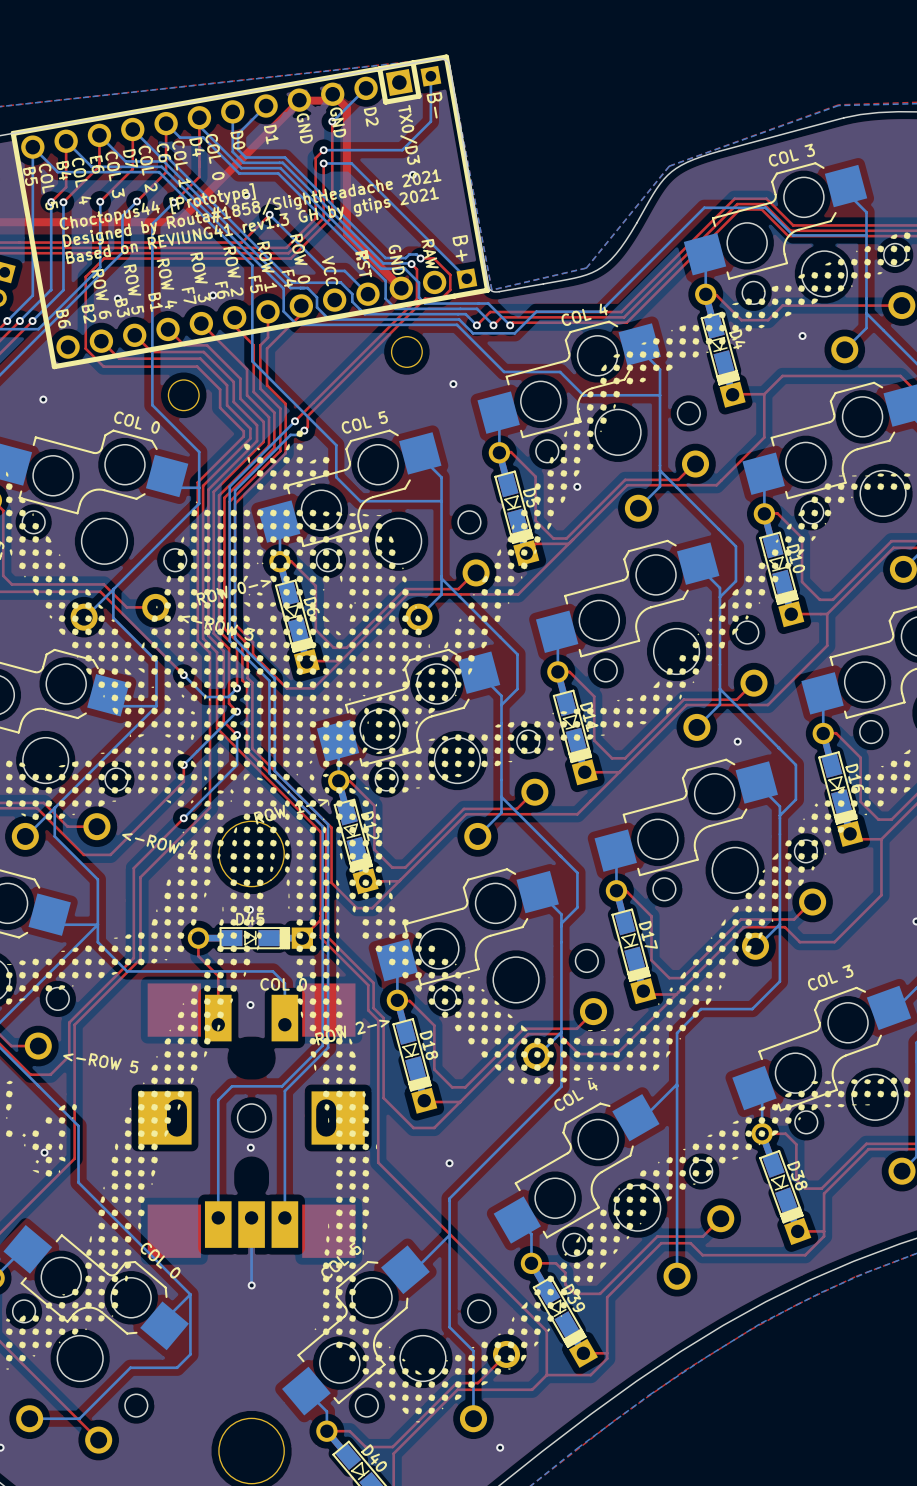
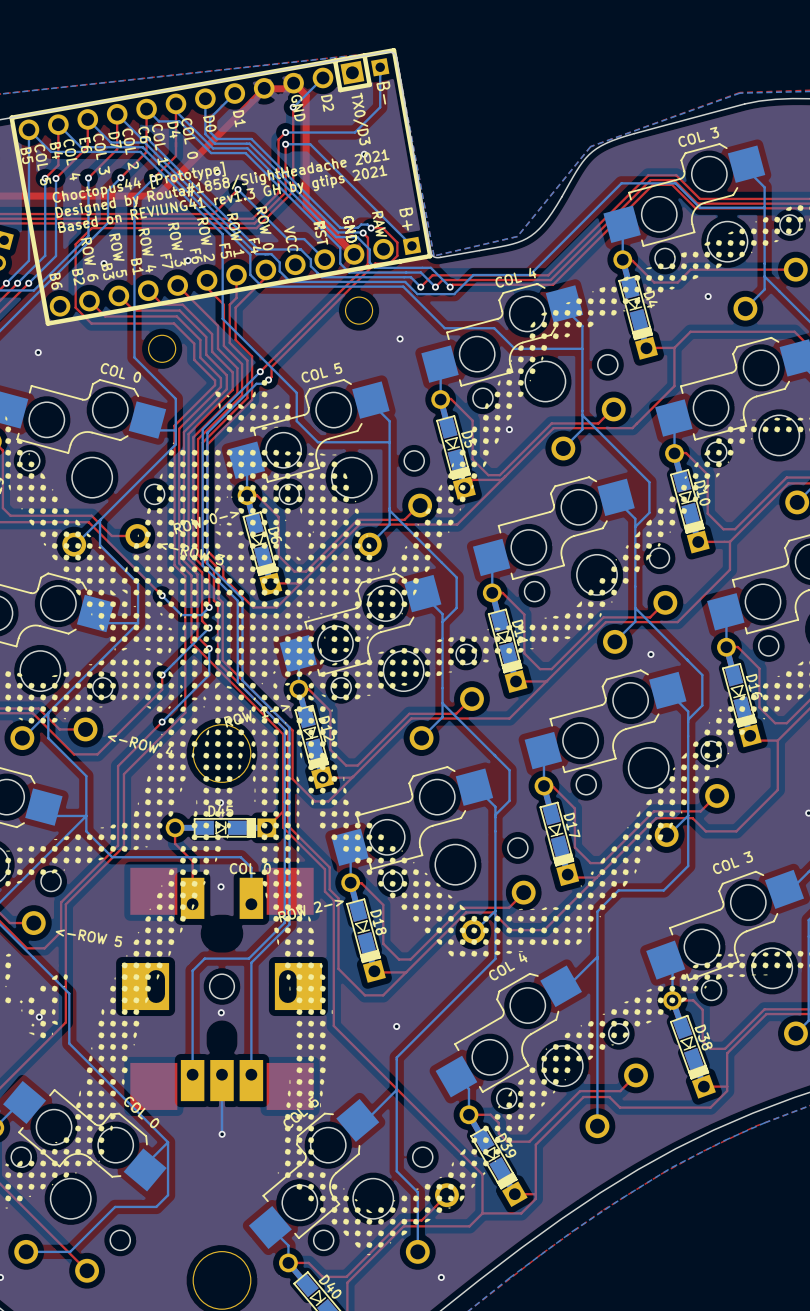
part footprint: [10, 54, 491, 370] -> [9, 48, 433, 326]

